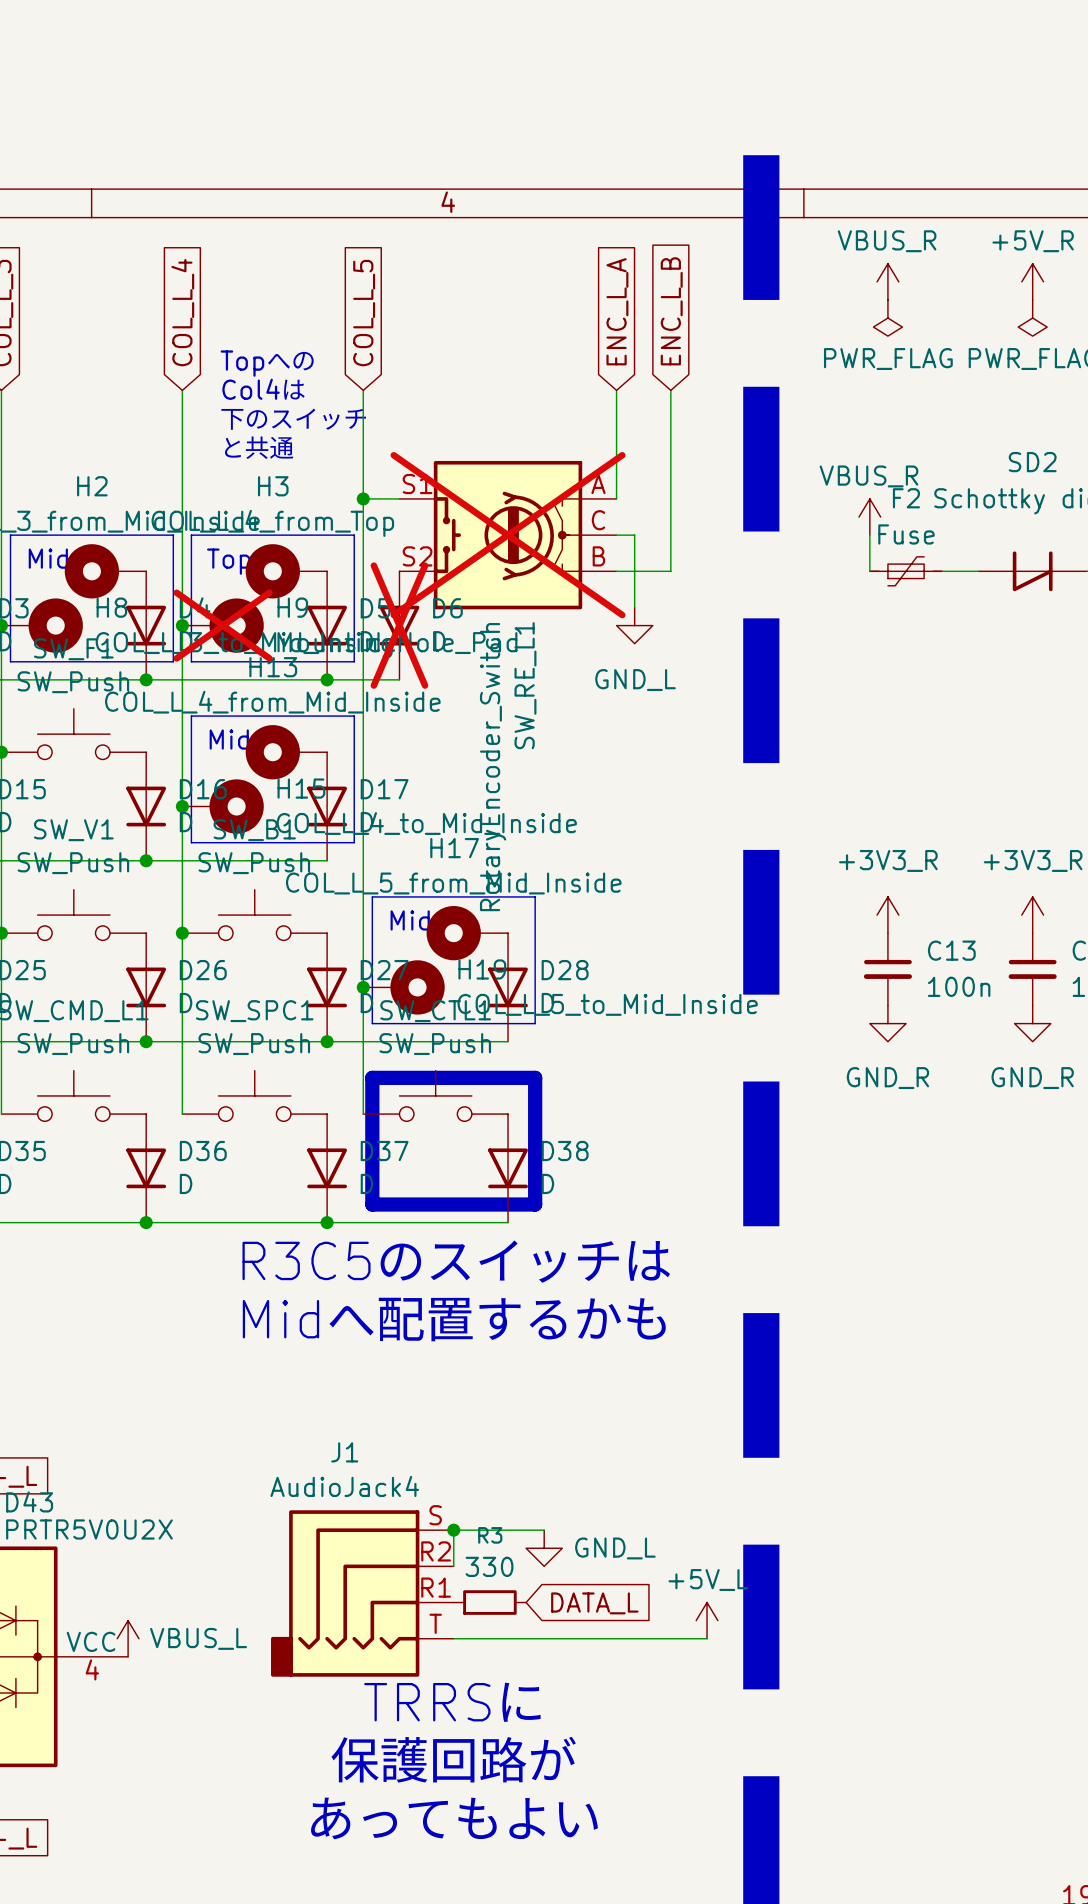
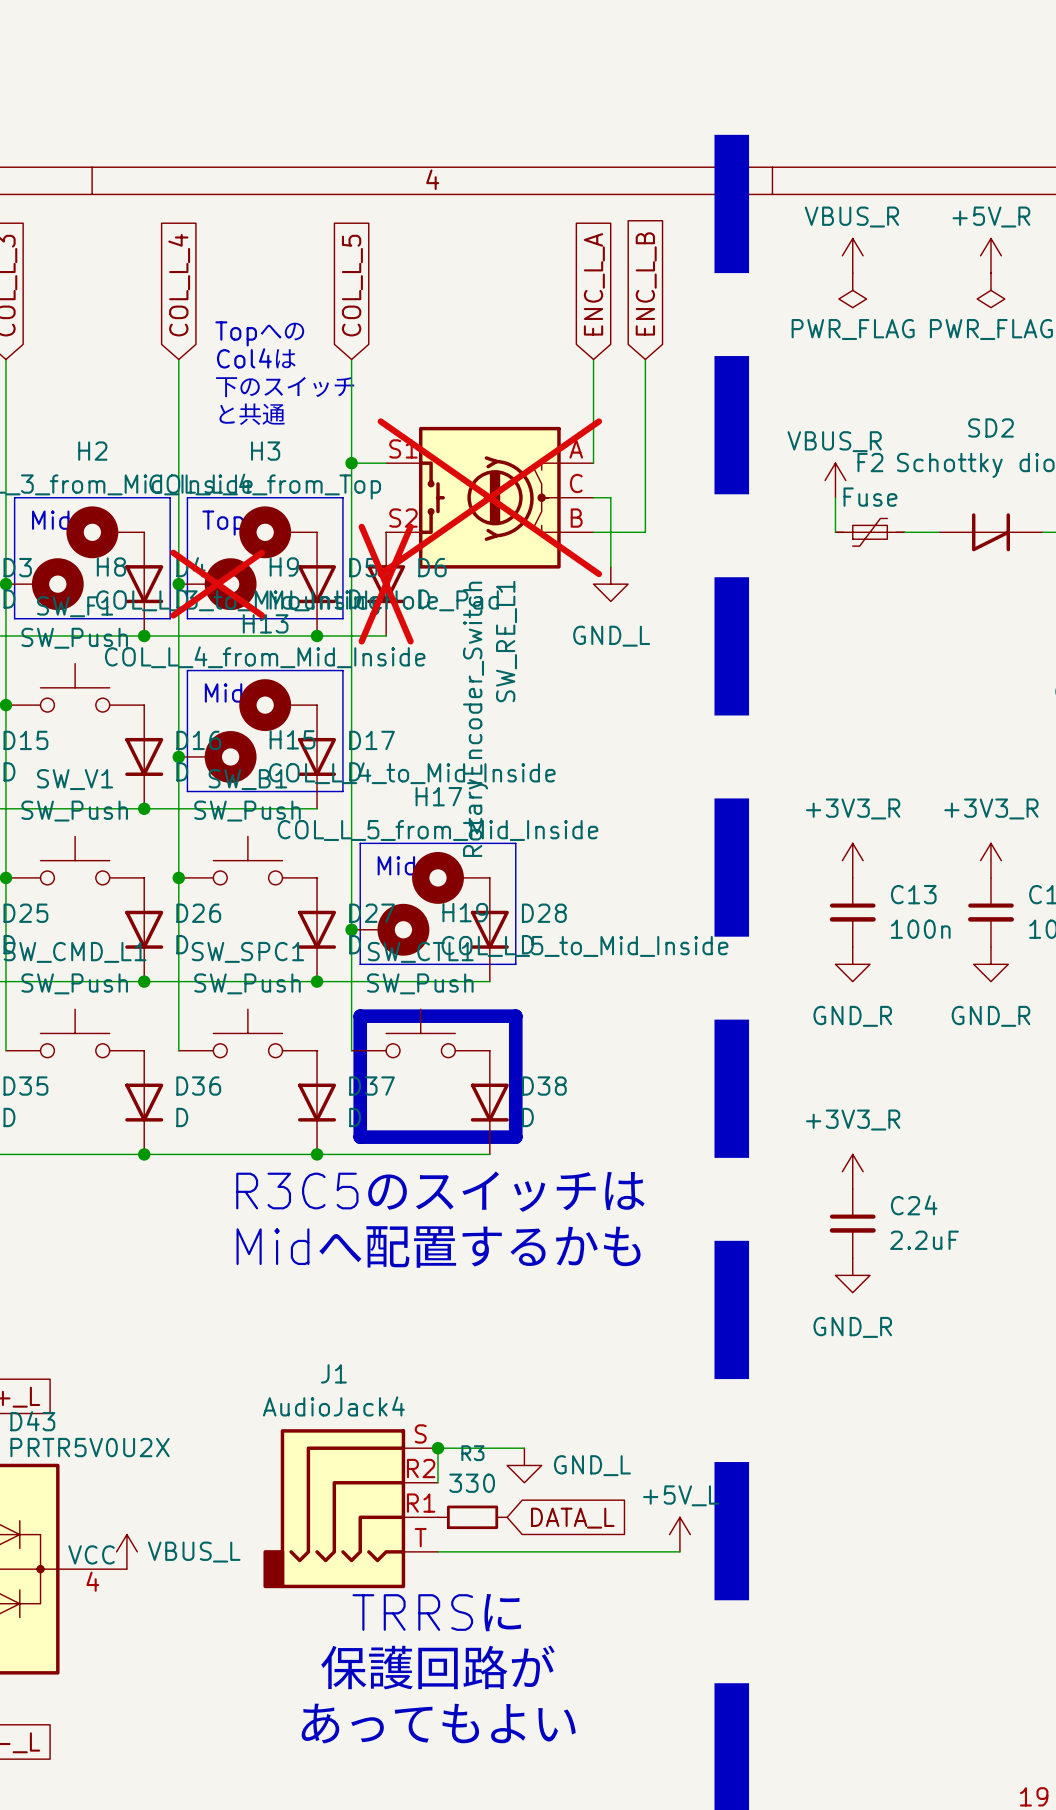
power symbol: none -> +3V3_R (852, 1171)
C24: none -> 2.2uF (852, 1223)
power symbol: none -> GND_R (852, 1275)

